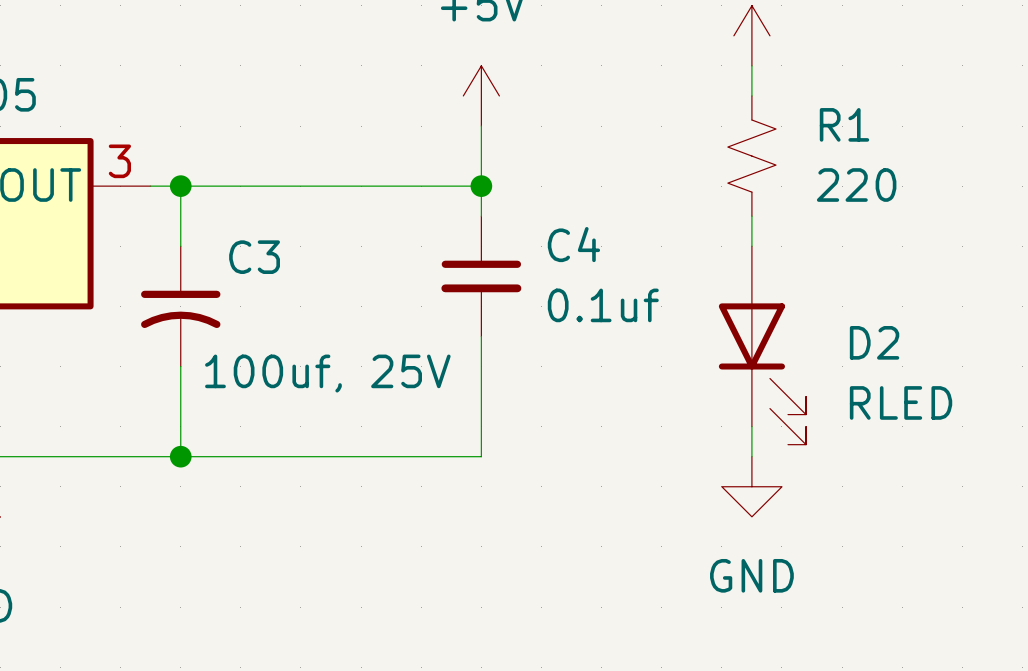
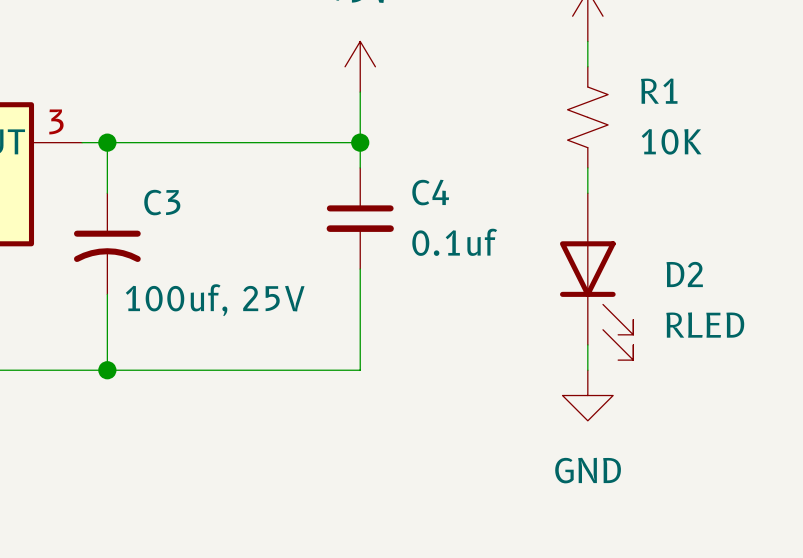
R1 value: 220 (856, 185) -> 10K (671, 141)

